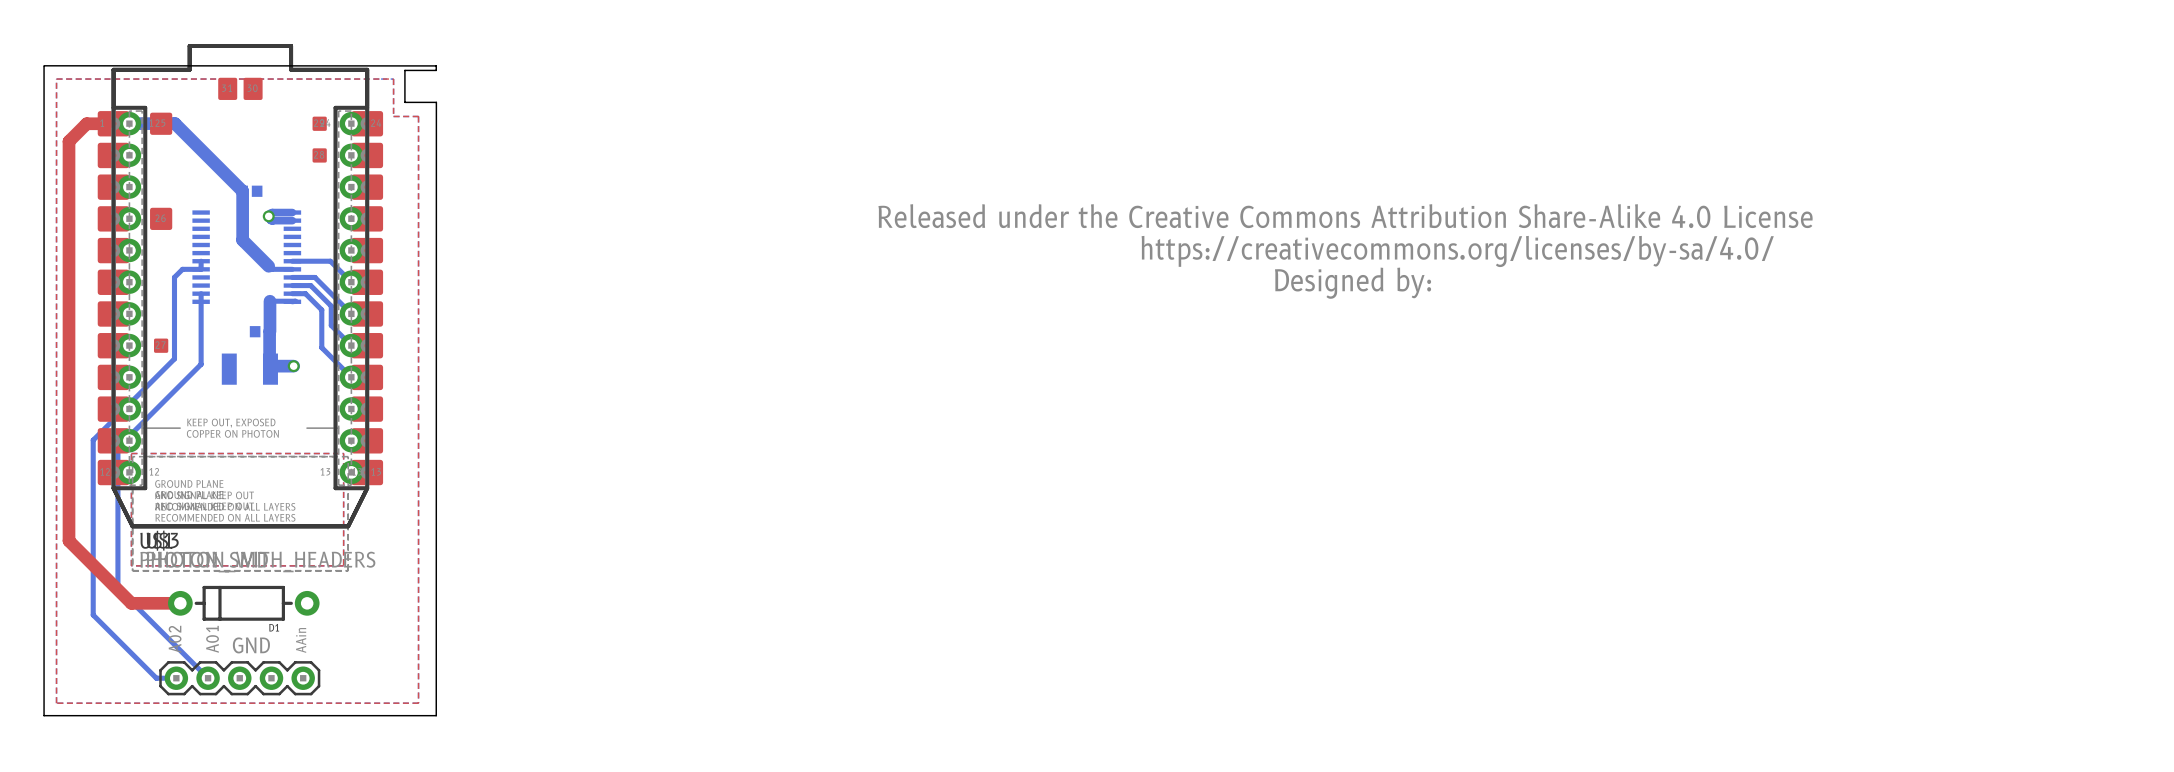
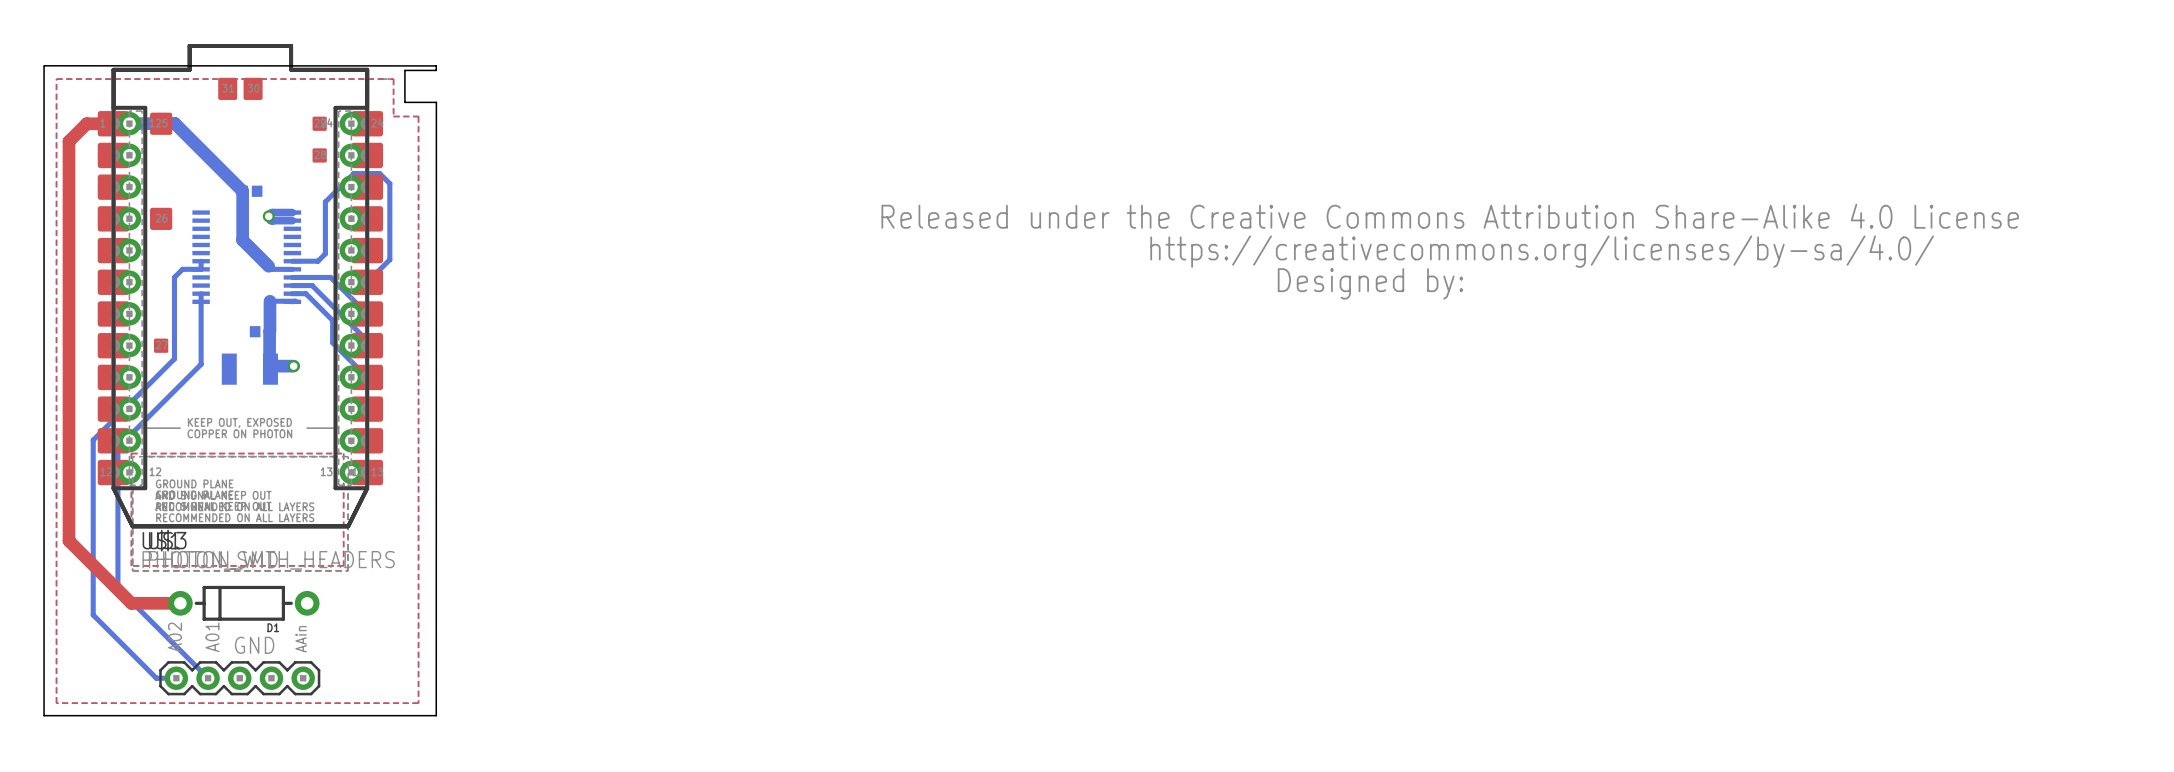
bottom track: (317, 261) (330, 261) (351, 282) -> (317, 261) (325, 253) (325, 201) (353, 173) (379, 173) (389, 183) (389, 259) (367, 282)
bottom track: (314, 277) (351, 313) -> (314, 277) (330, 277) (367, 314)
bottom track: (310, 285) (331, 306) (331, 325) (351, 345) -> (310, 285) (367, 340) (367, 345)
bottom track: (305, 293) (321, 309) (321, 347) (351, 377) -> (305, 293) (332, 320) (332, 342) (367, 377)

